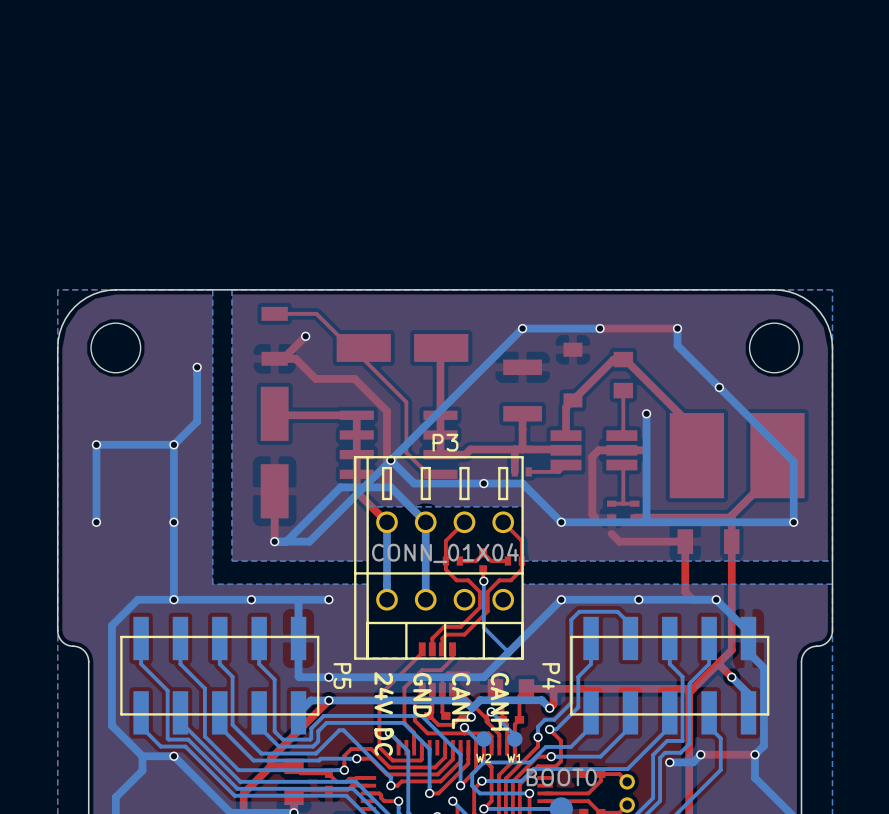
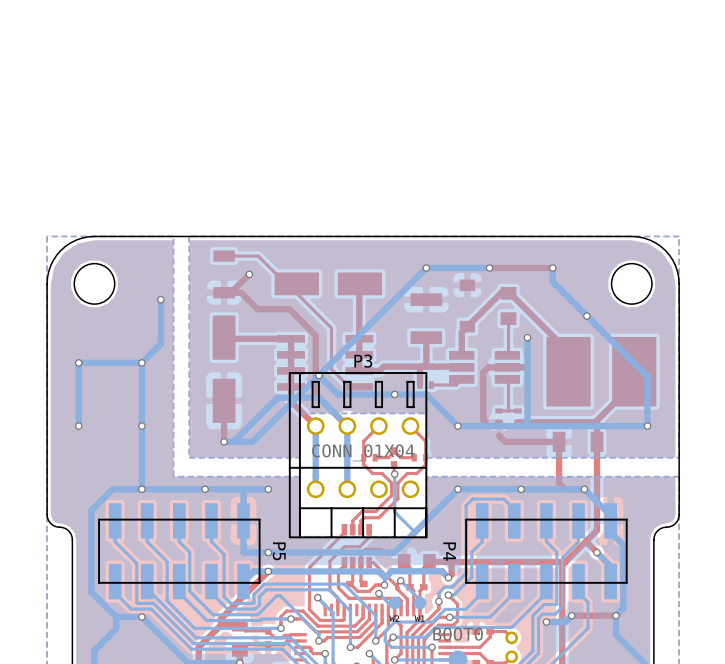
text: GND (422, 695) -> none
text: CANL (461, 701) -> none
text: CANH (499, 701) -> none
text: 24V DC (384, 713) -> none

